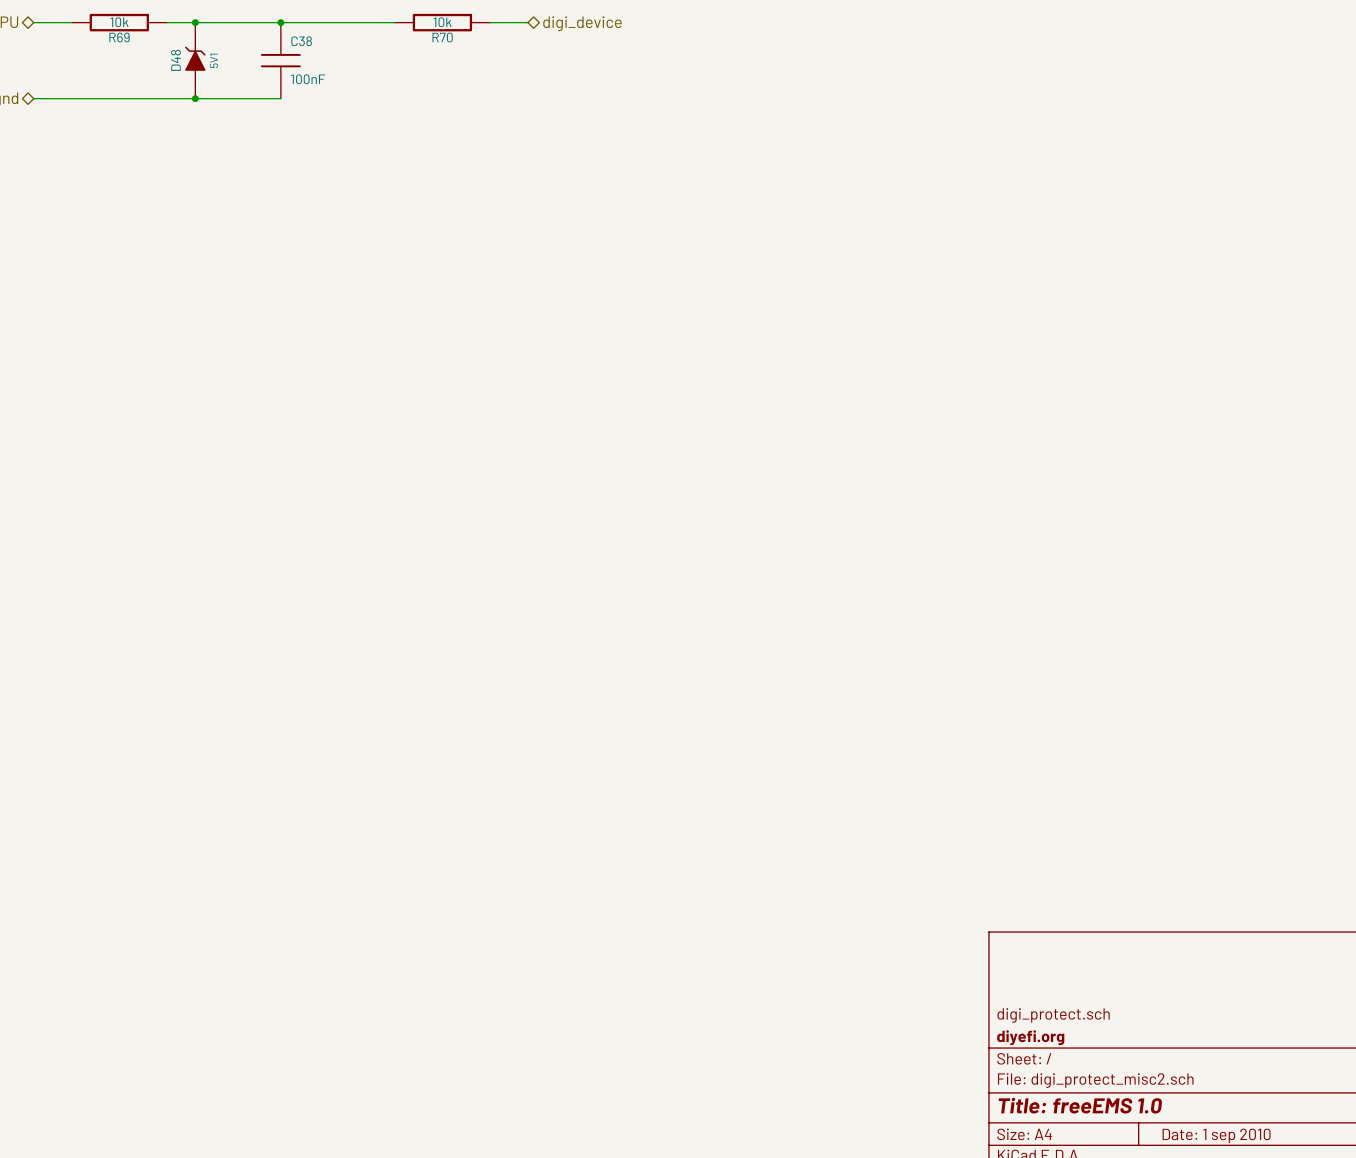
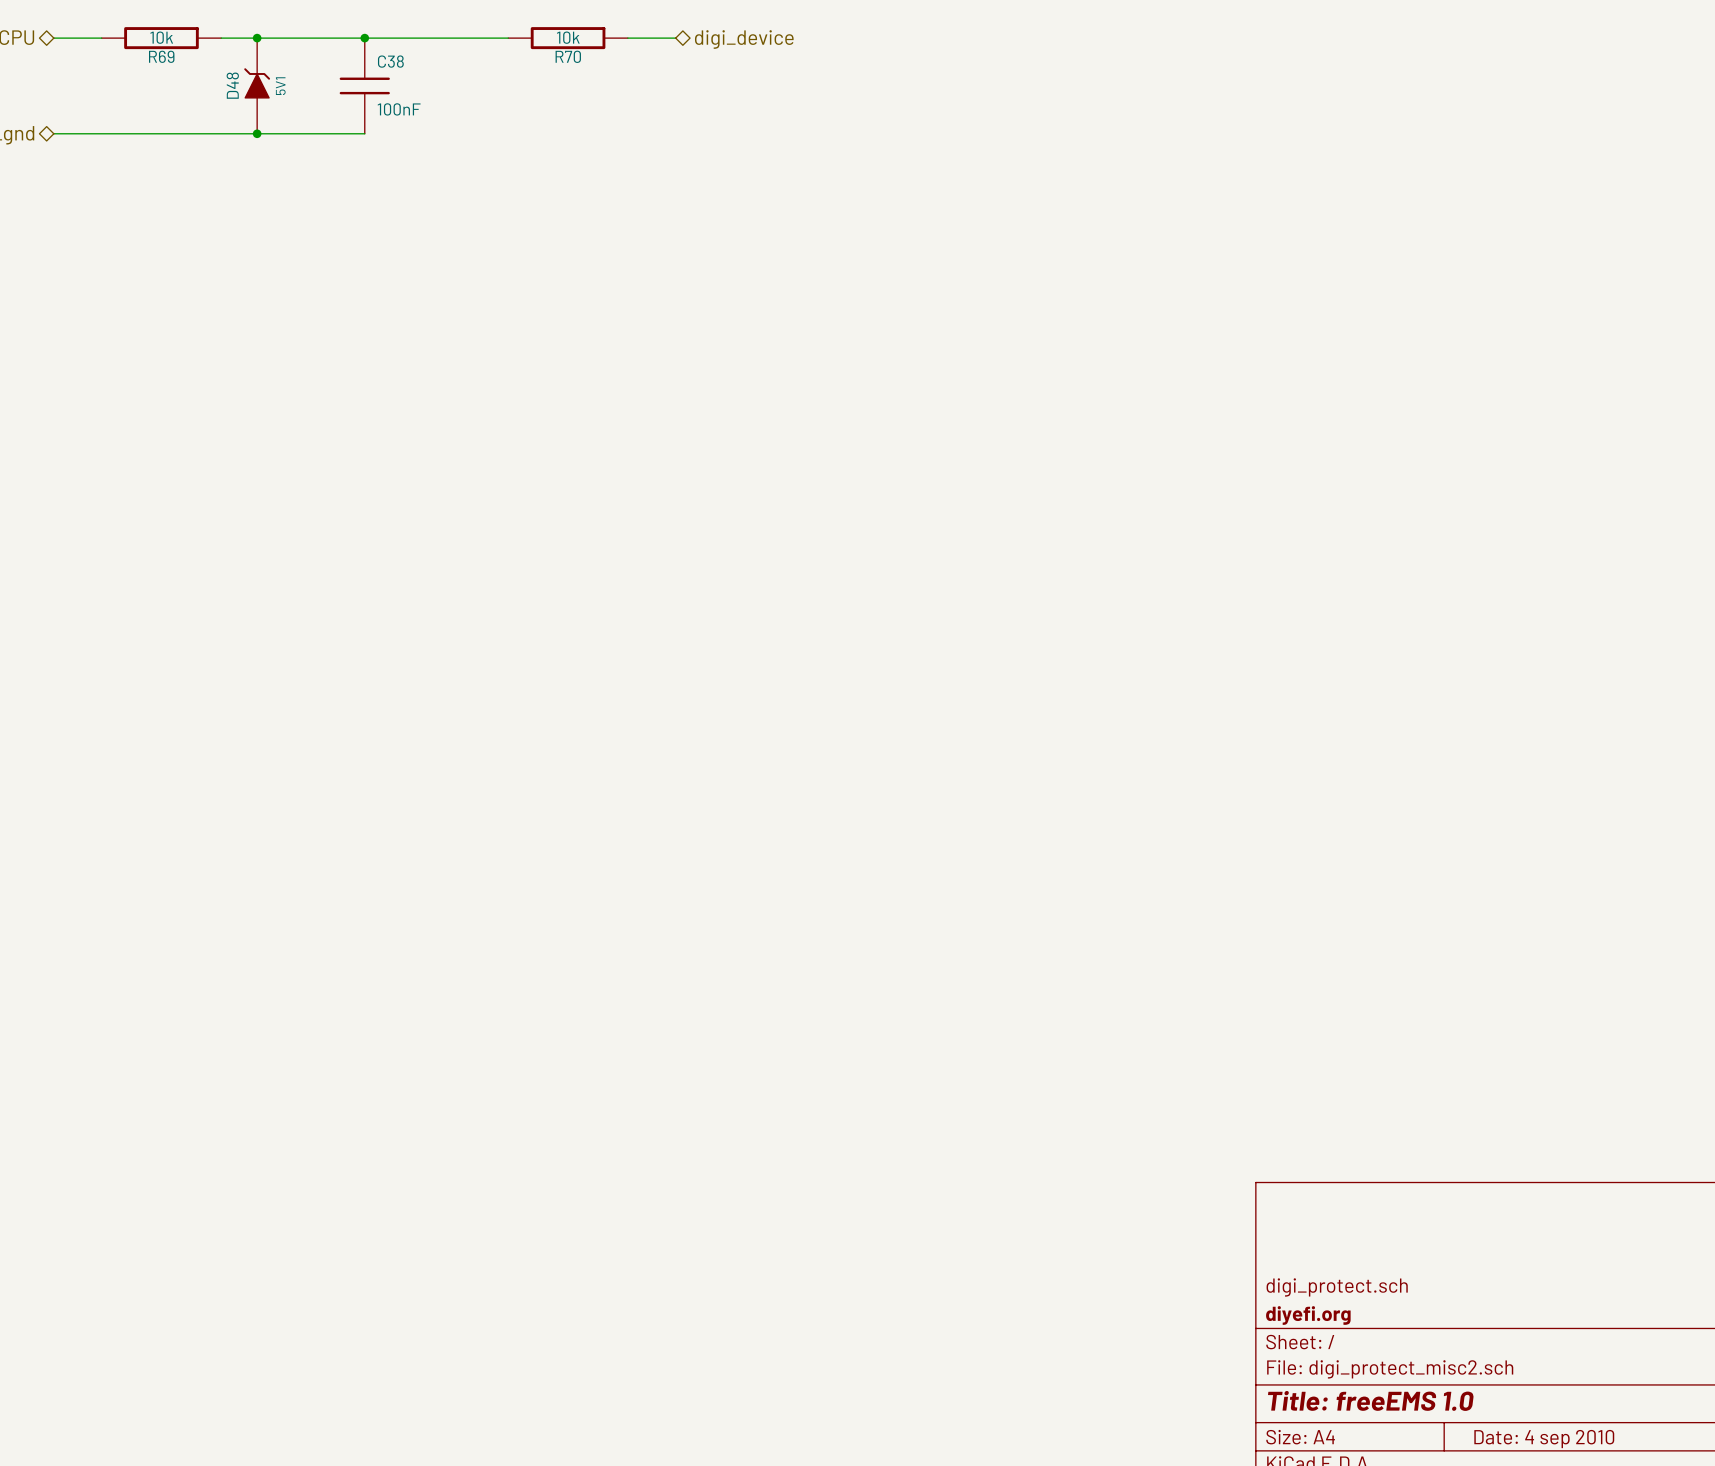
title block: Date: 1 sep 2010 (1216, 1135) -> Date: 4 sep 2010 (1544, 1439)

